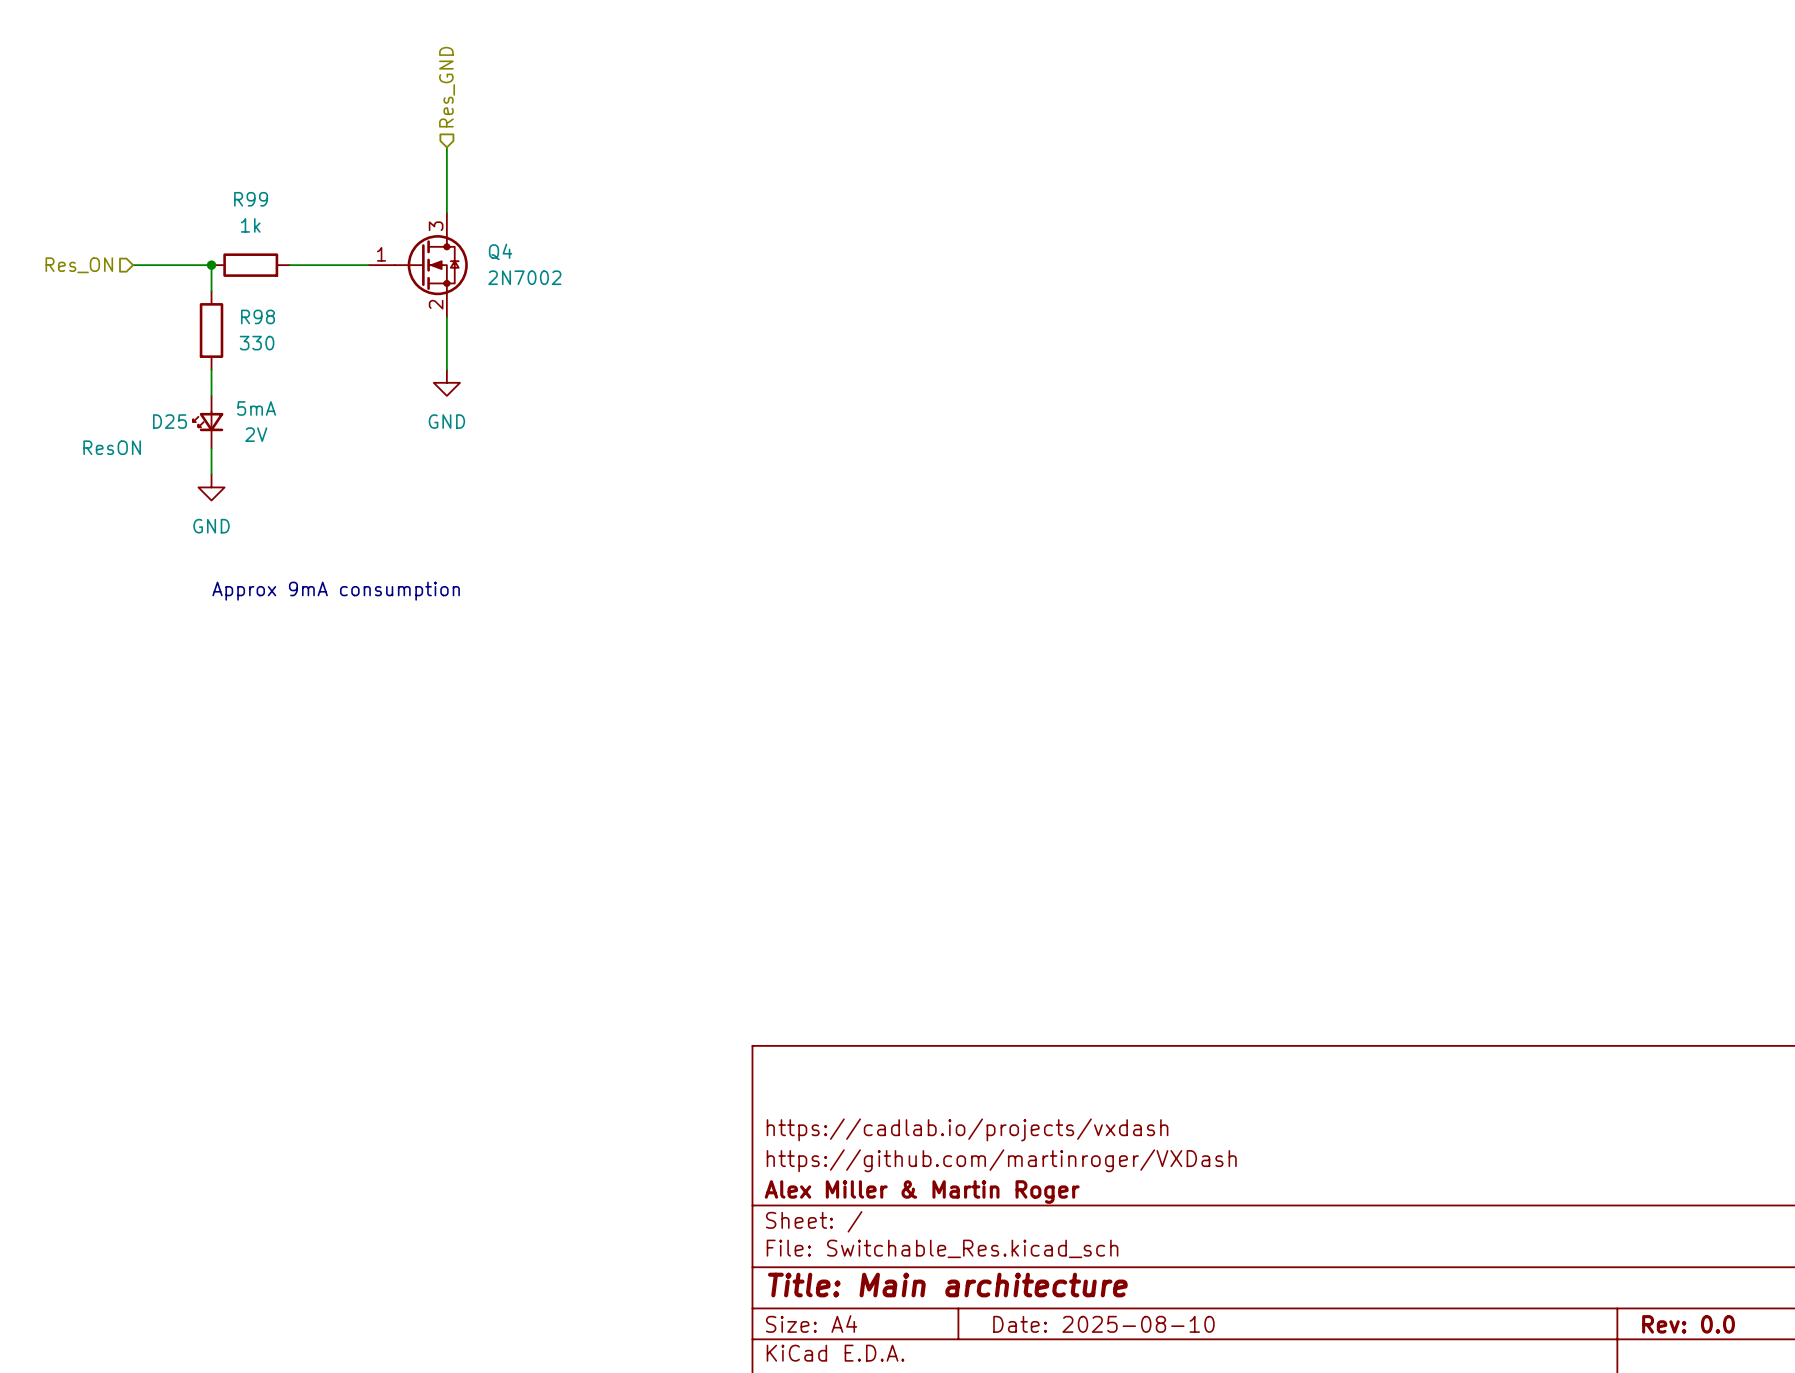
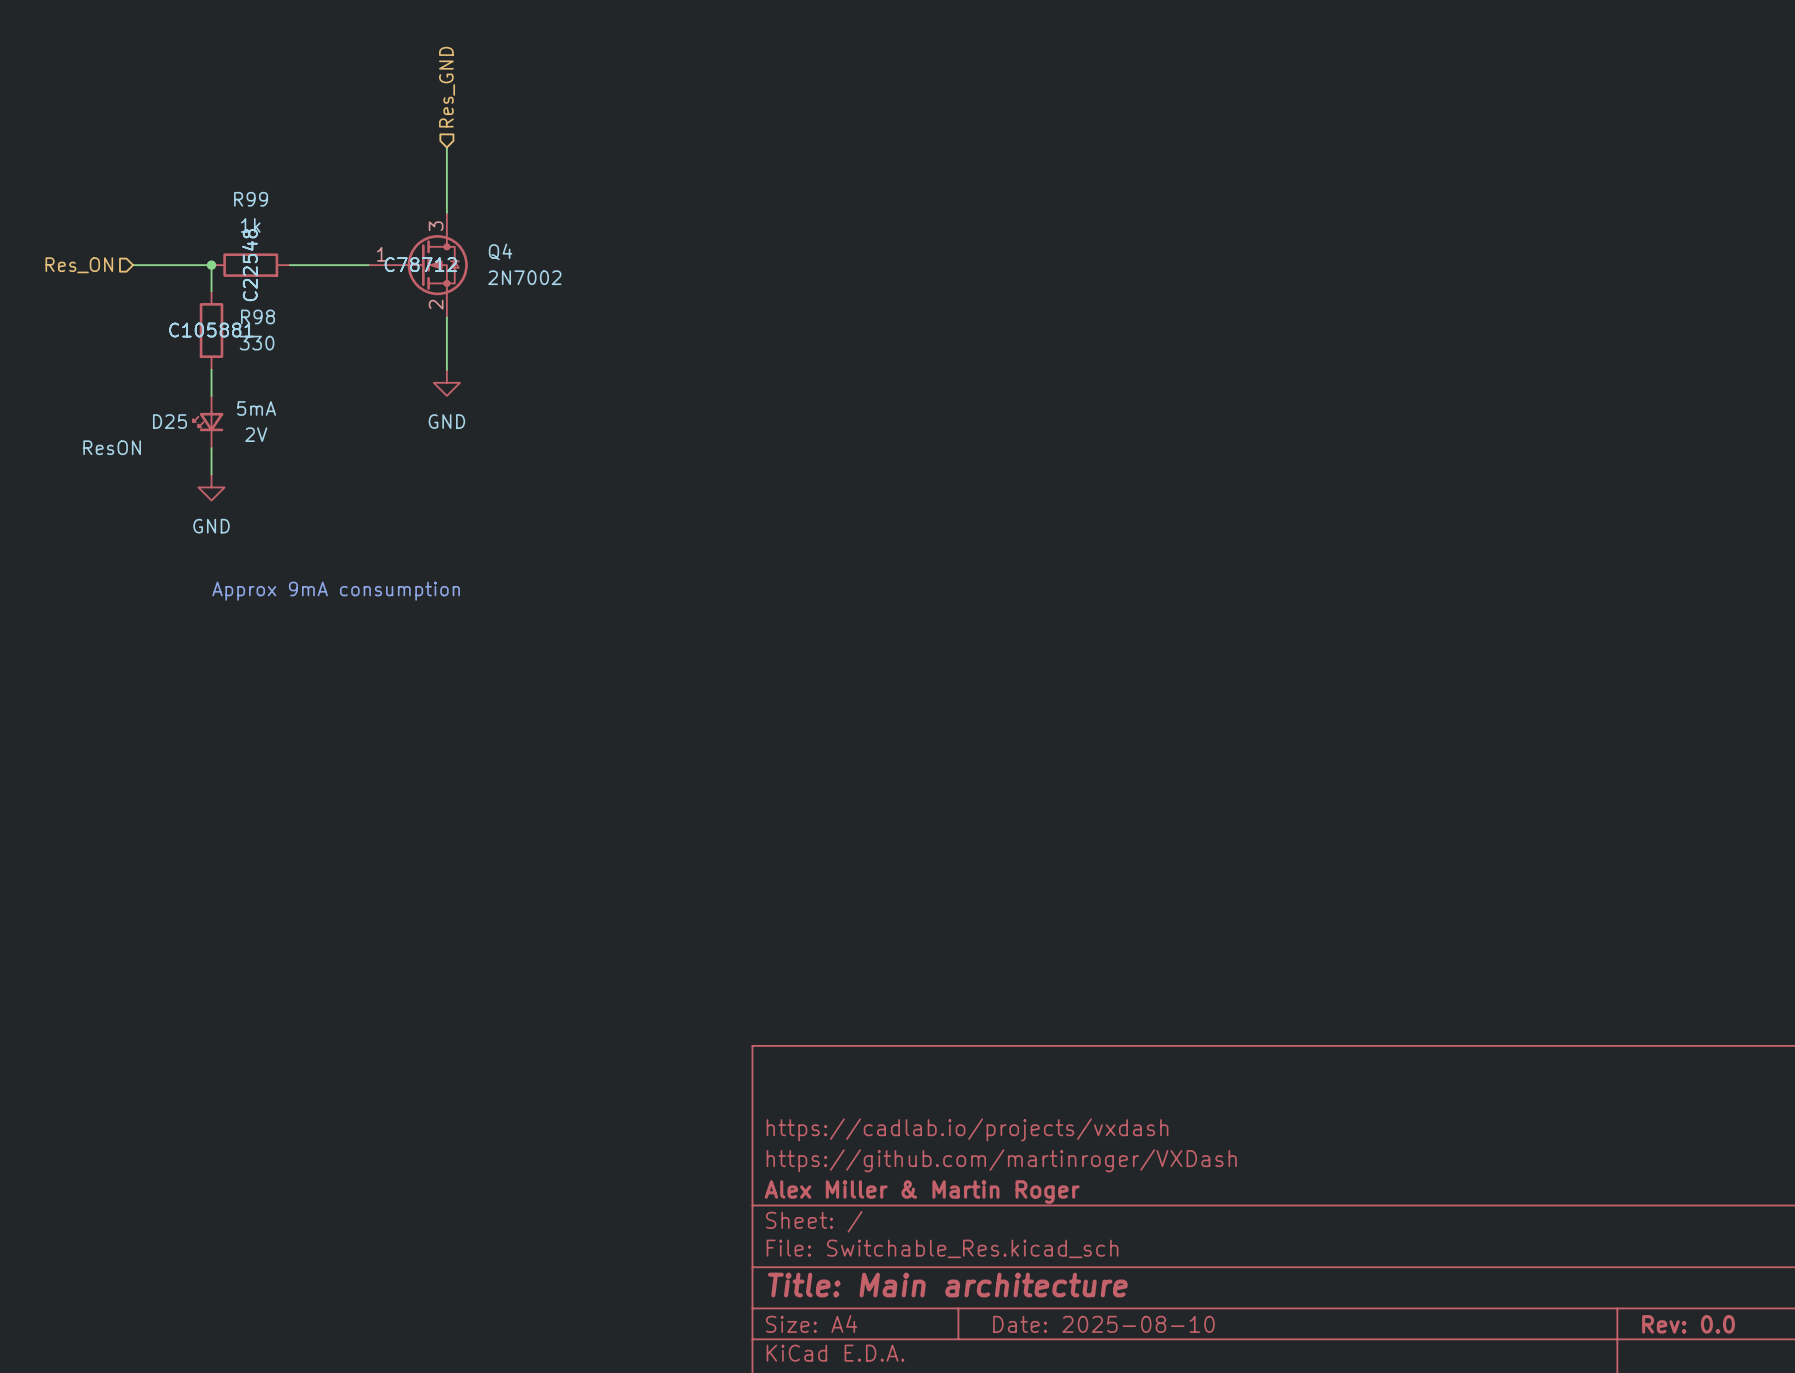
Q4 text: none -> C78712 (420, 264)
Q4 text: none -> C78712 (420, 264)
R99 text: none -> C22548 (249, 265)
R99 text: none -> C22548 (249, 265)
R98 text: none -> C105881 (211, 330)
R98 text: none -> C105881 (211, 330)

